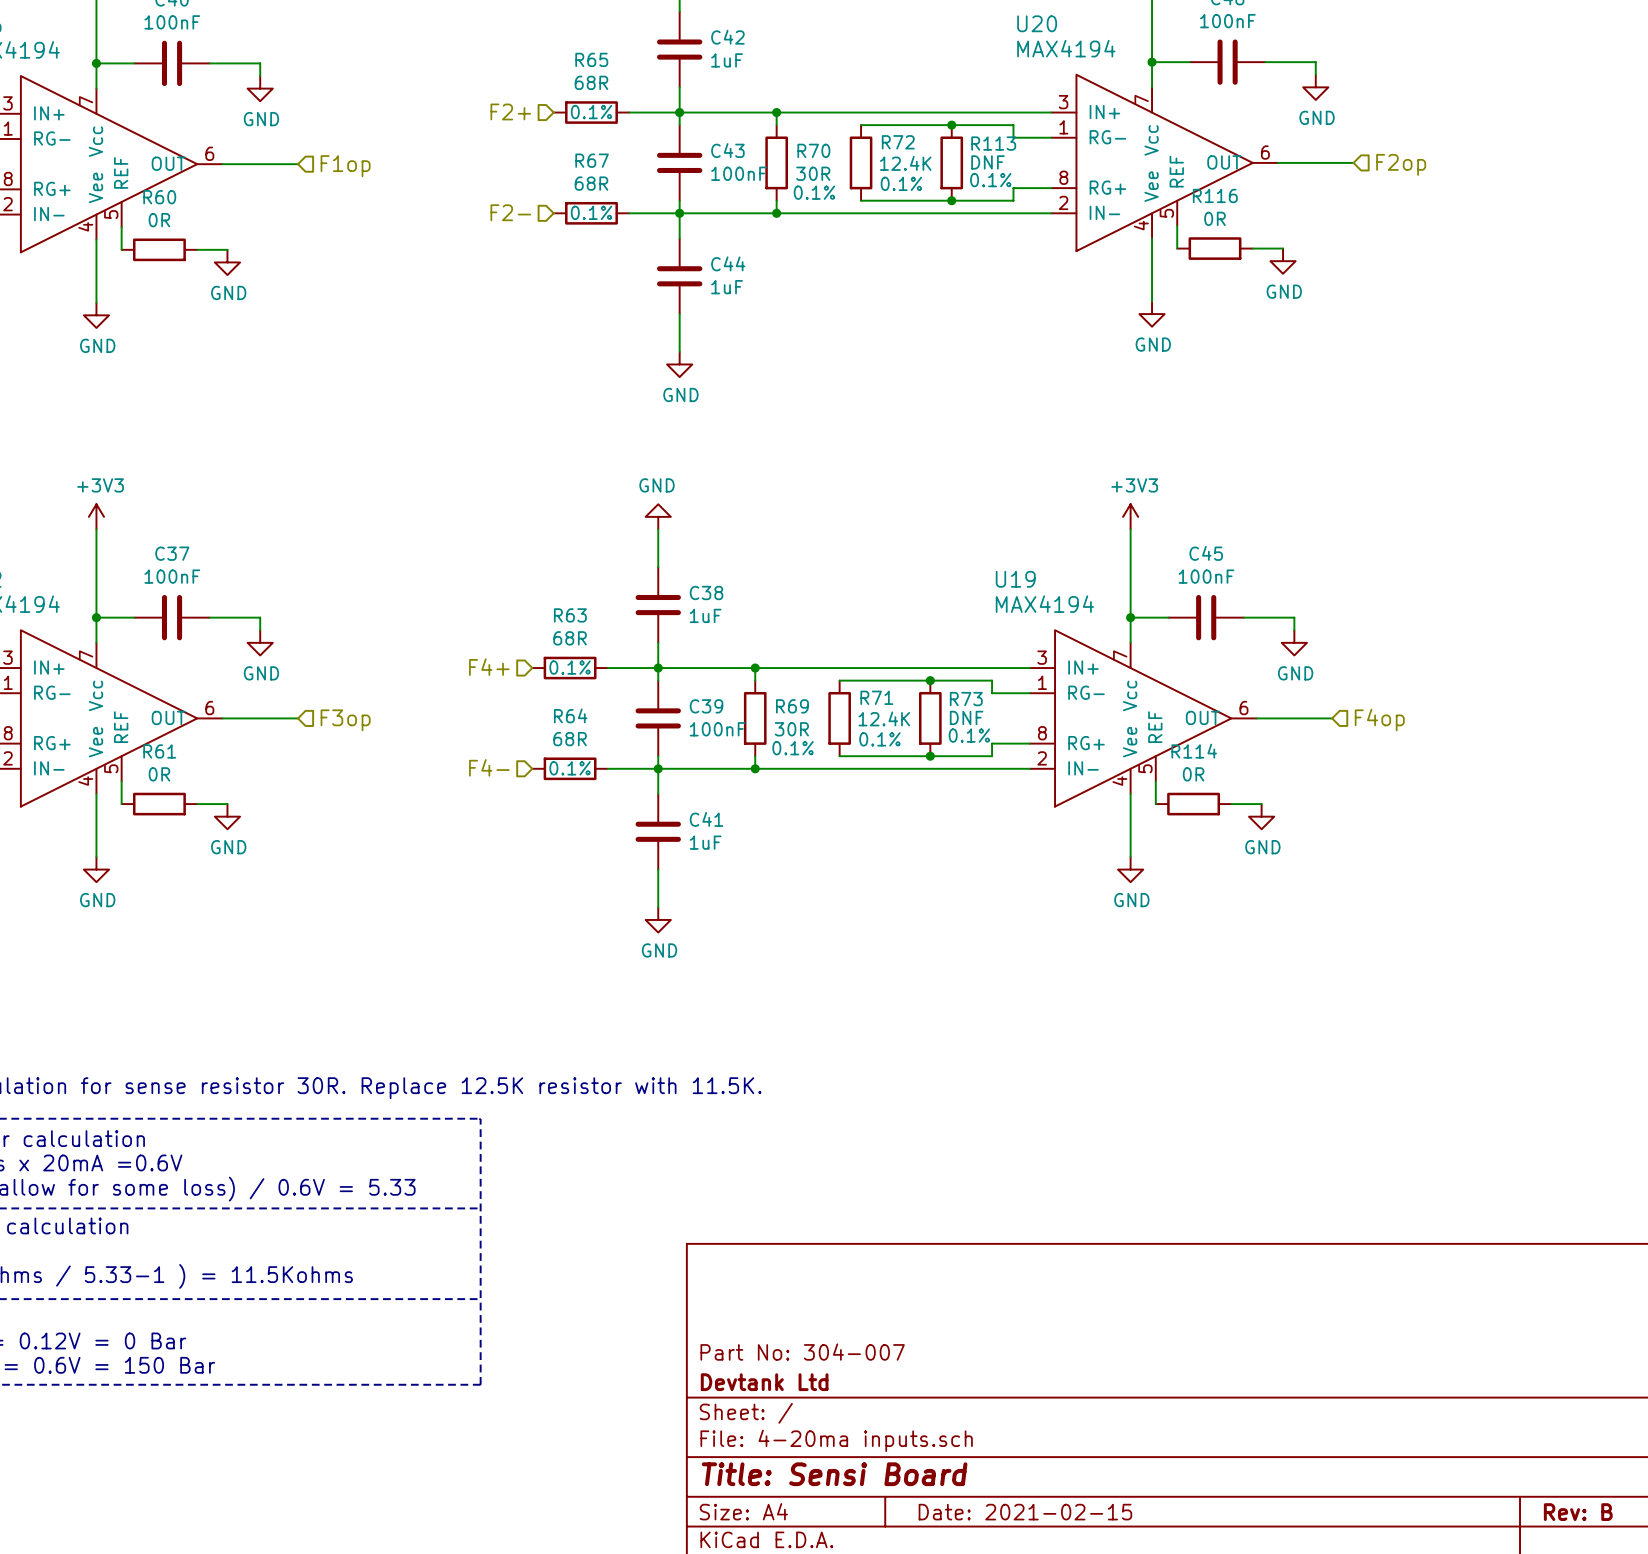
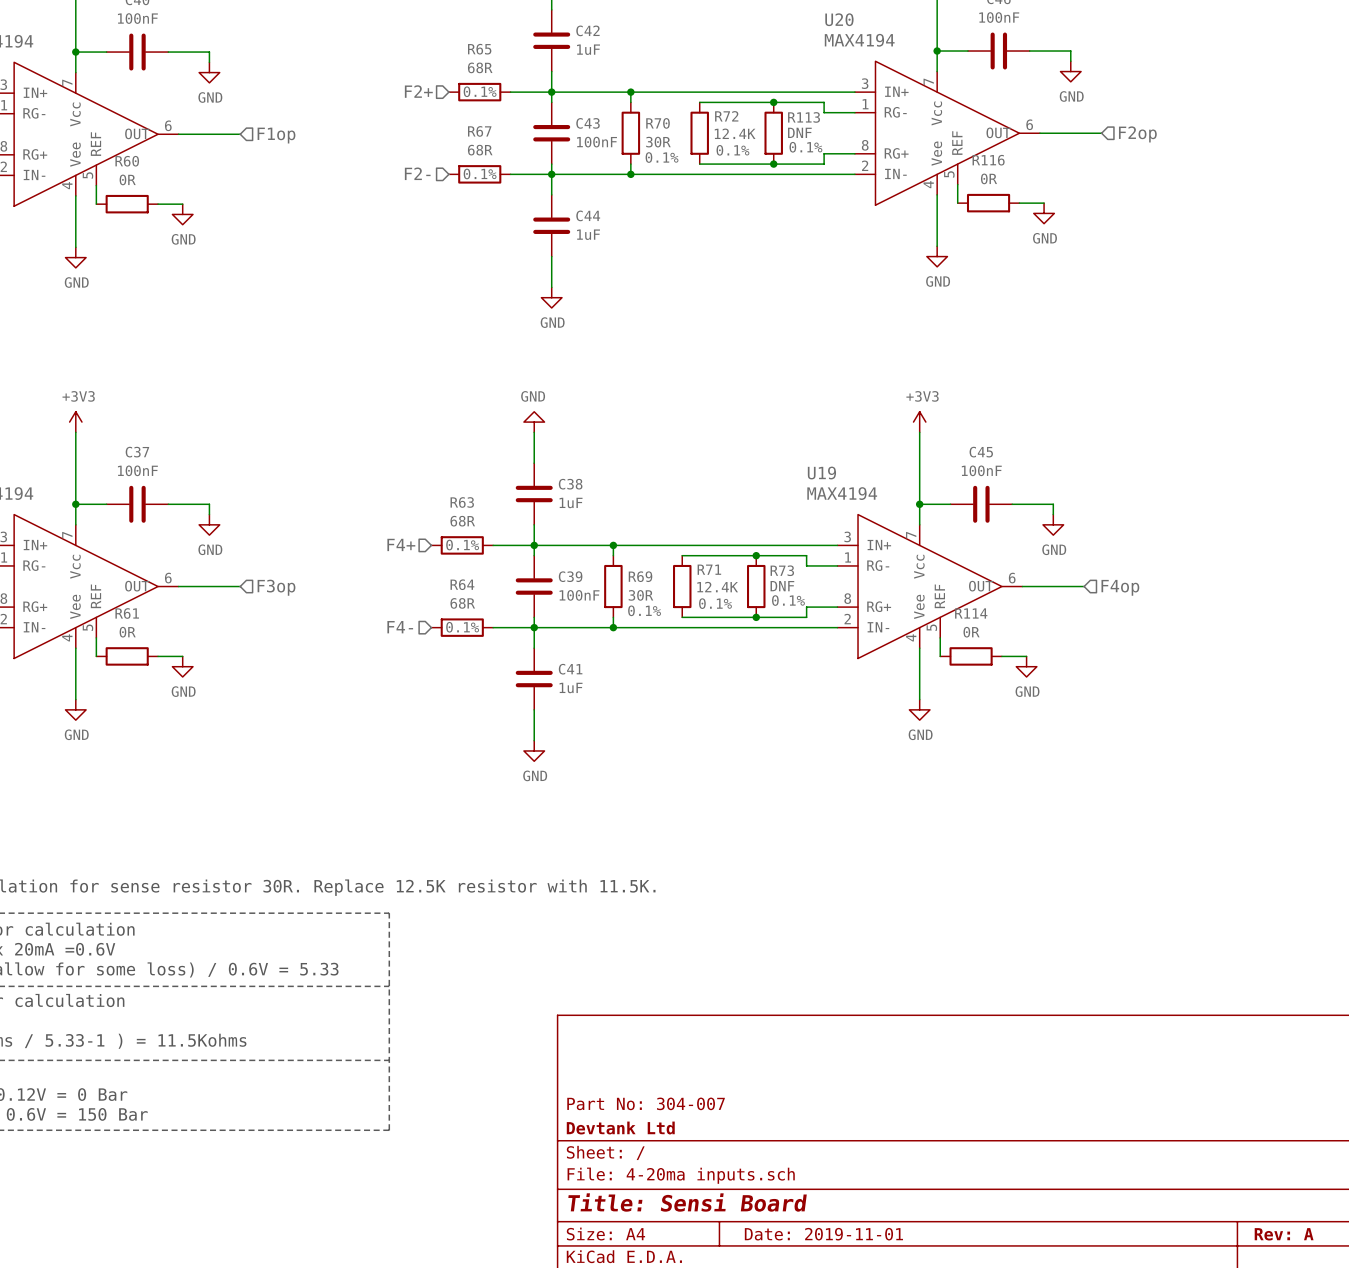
title block: Date: 2021-02-15 (1025, 1512) -> Date: 2019-11-01 (823, 1234)
title block: Rev: B (1578, 1512) -> Rev: A (1284, 1234)

